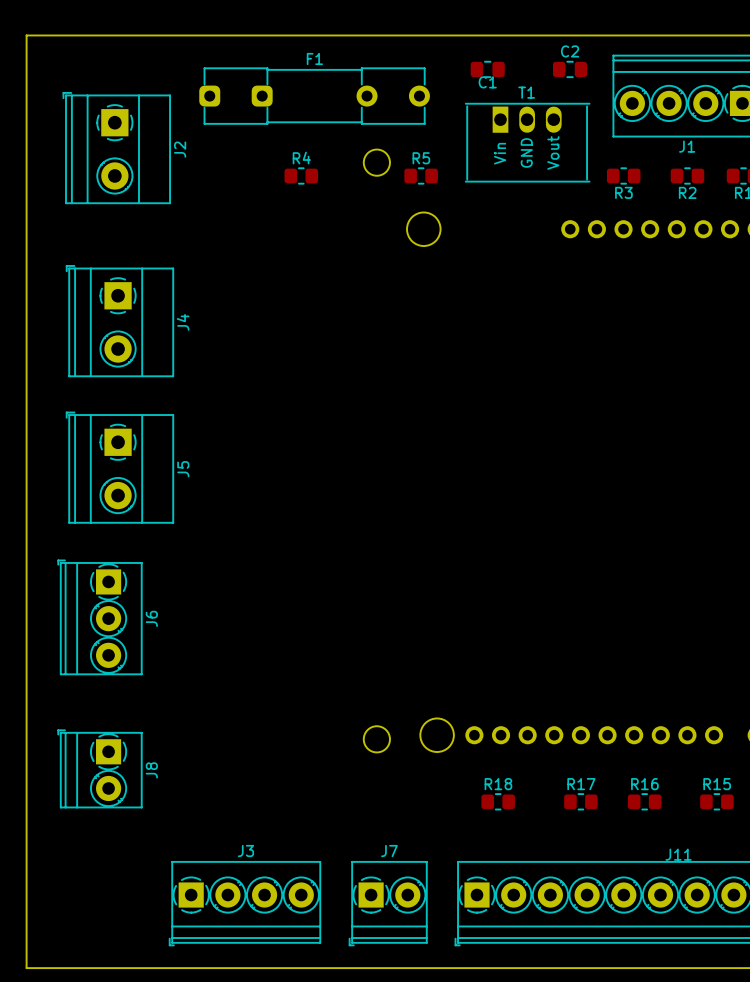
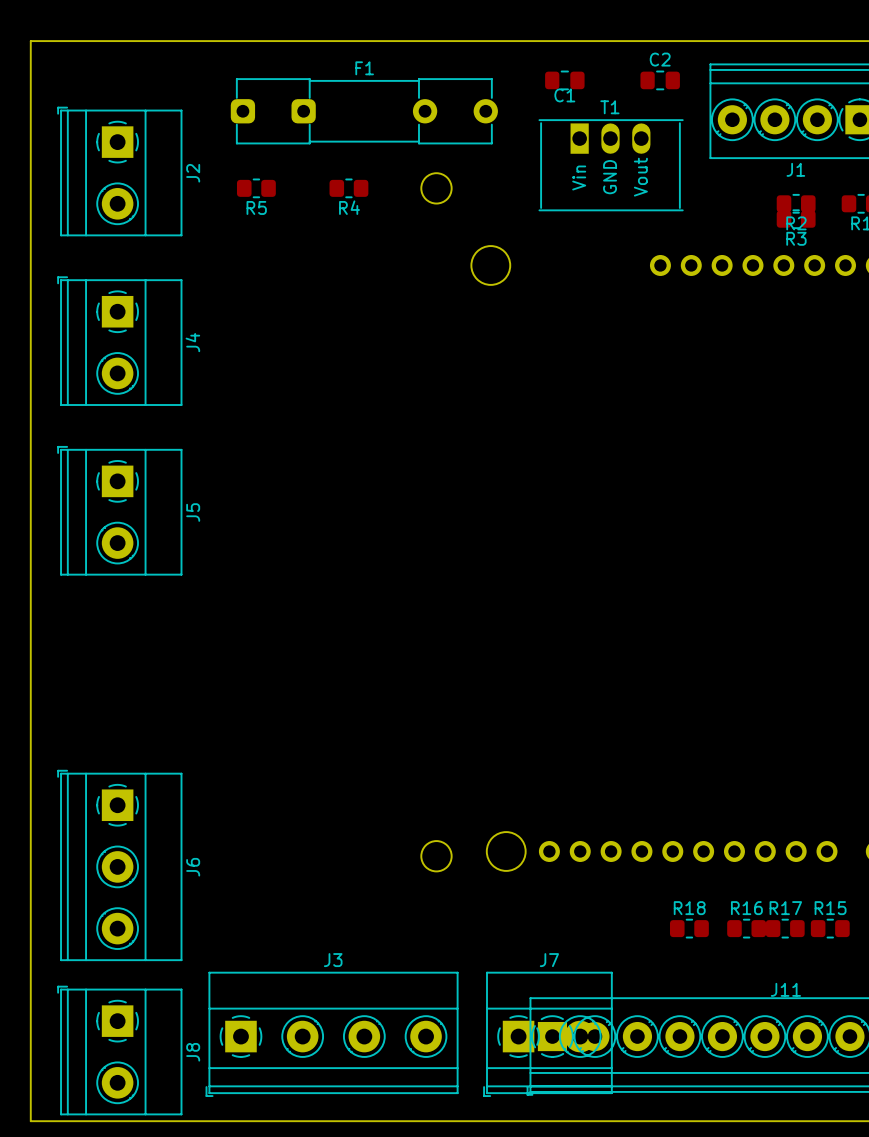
J2 position: (116, 148) -> (119, 171)
R4 name position: R4 (301, 158) -> R4 (349, 207)
R5 name position: R5 (421, 158) -> R5 (256, 207)
R4 position: (301, 175) -> (348, 188)
R5 position: (421, 175) -> (256, 188)
R3 position: (623, 175) -> (796, 219)
J4 position: (119, 321) -> (119, 341)
J5 position: (119, 467) -> (119, 510)
J6 footprint: [57, 559, 143, 675] -> [57, 770, 183, 961]
J8 footprint: [57, 729, 143, 809] -> [57, 985, 183, 1116]
R18 position: (498, 801) -> (689, 928)
R17 position: (580, 801) -> (785, 928)
J3 footprint: [169, 861, 321, 946] -> [205, 971, 459, 1097]
J7 footprint: [348, 861, 428, 946] -> [483, 971, 613, 1097]

